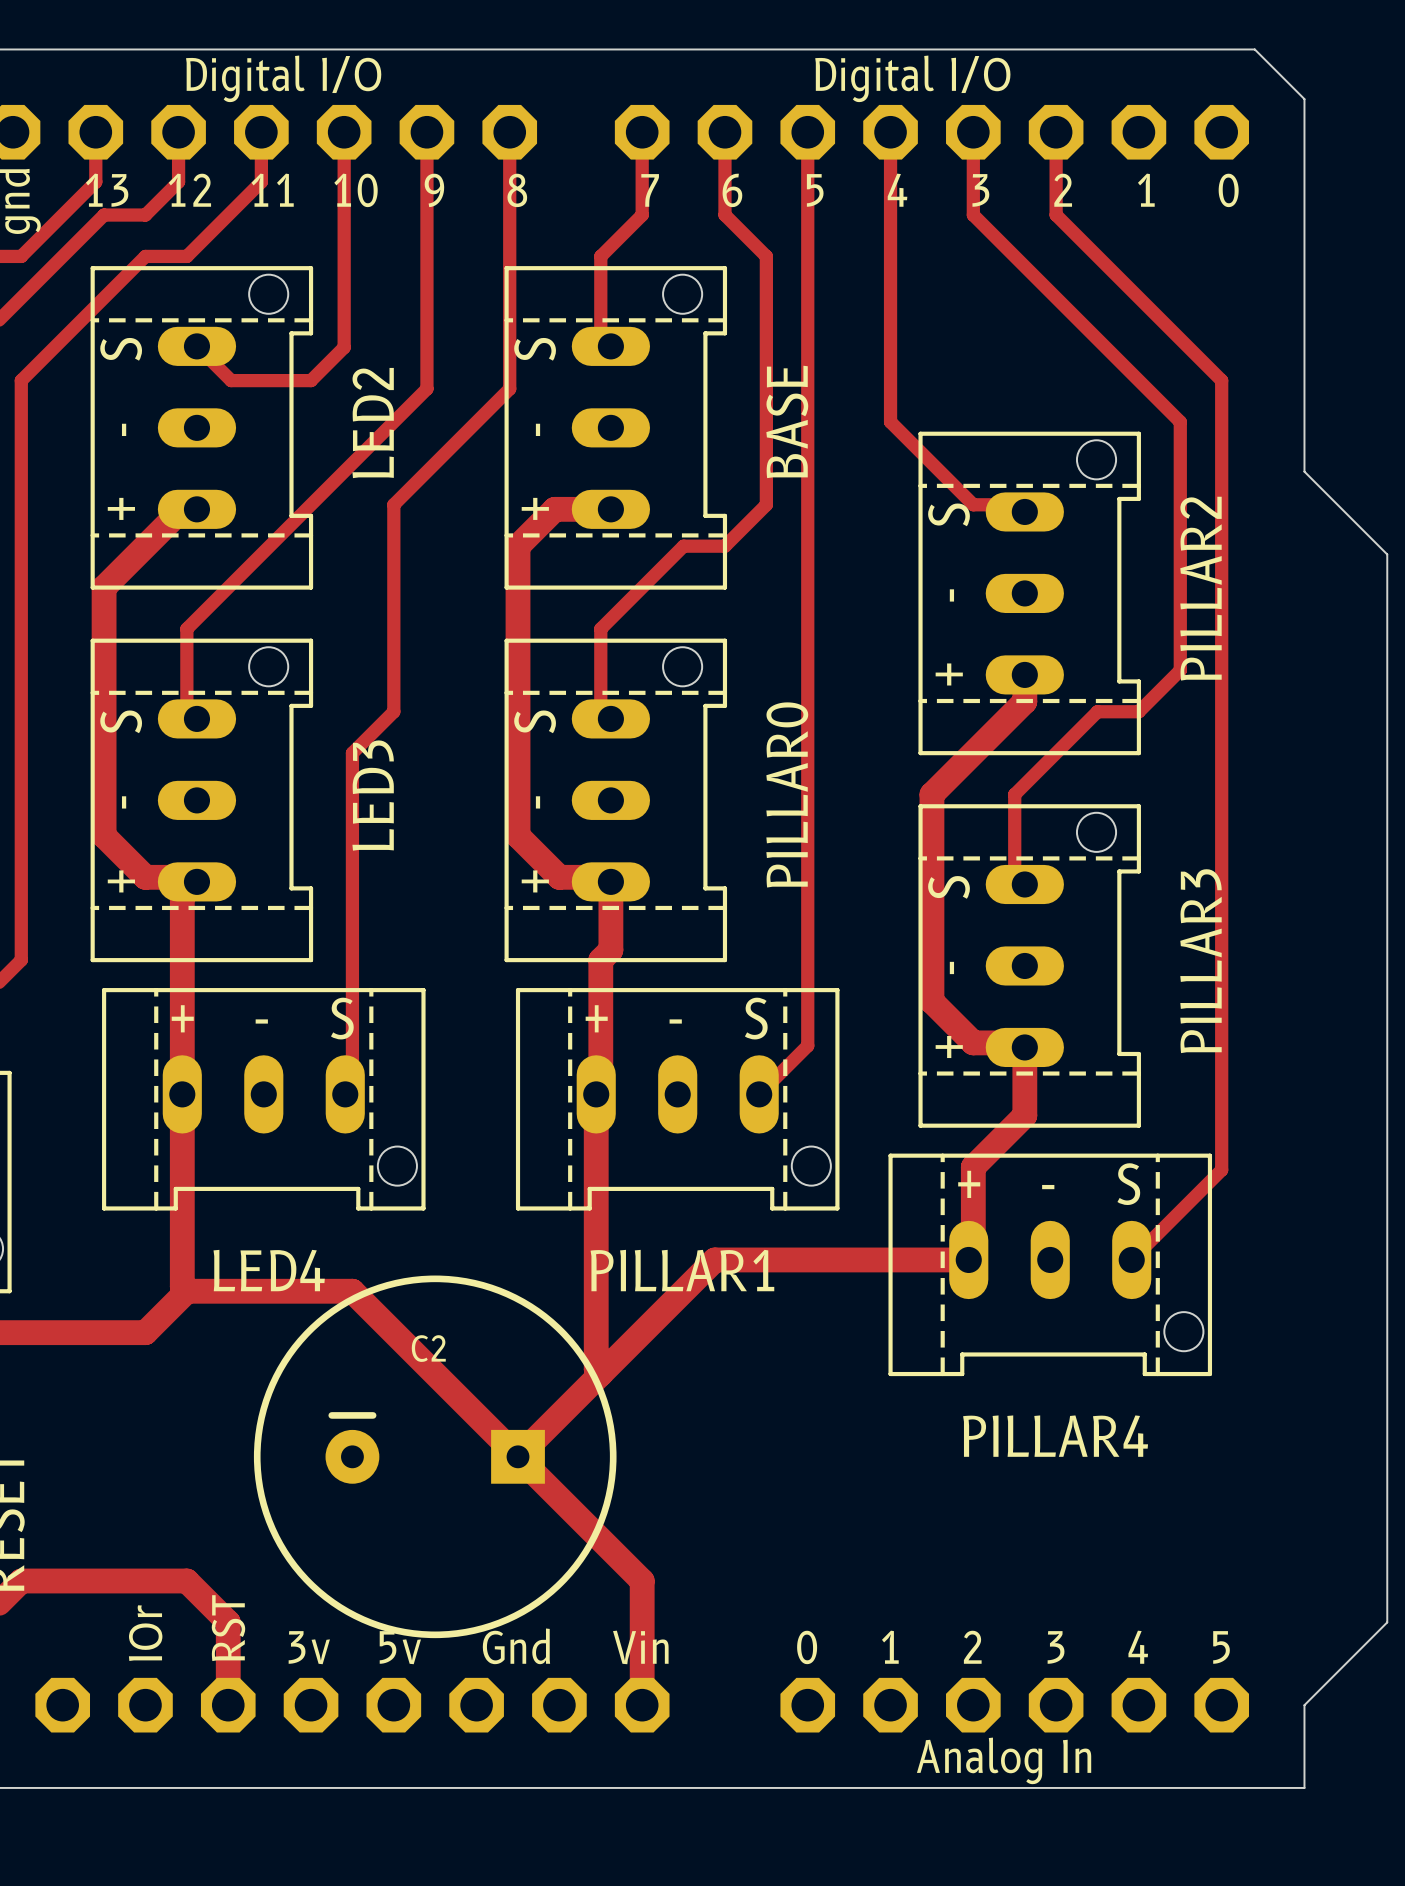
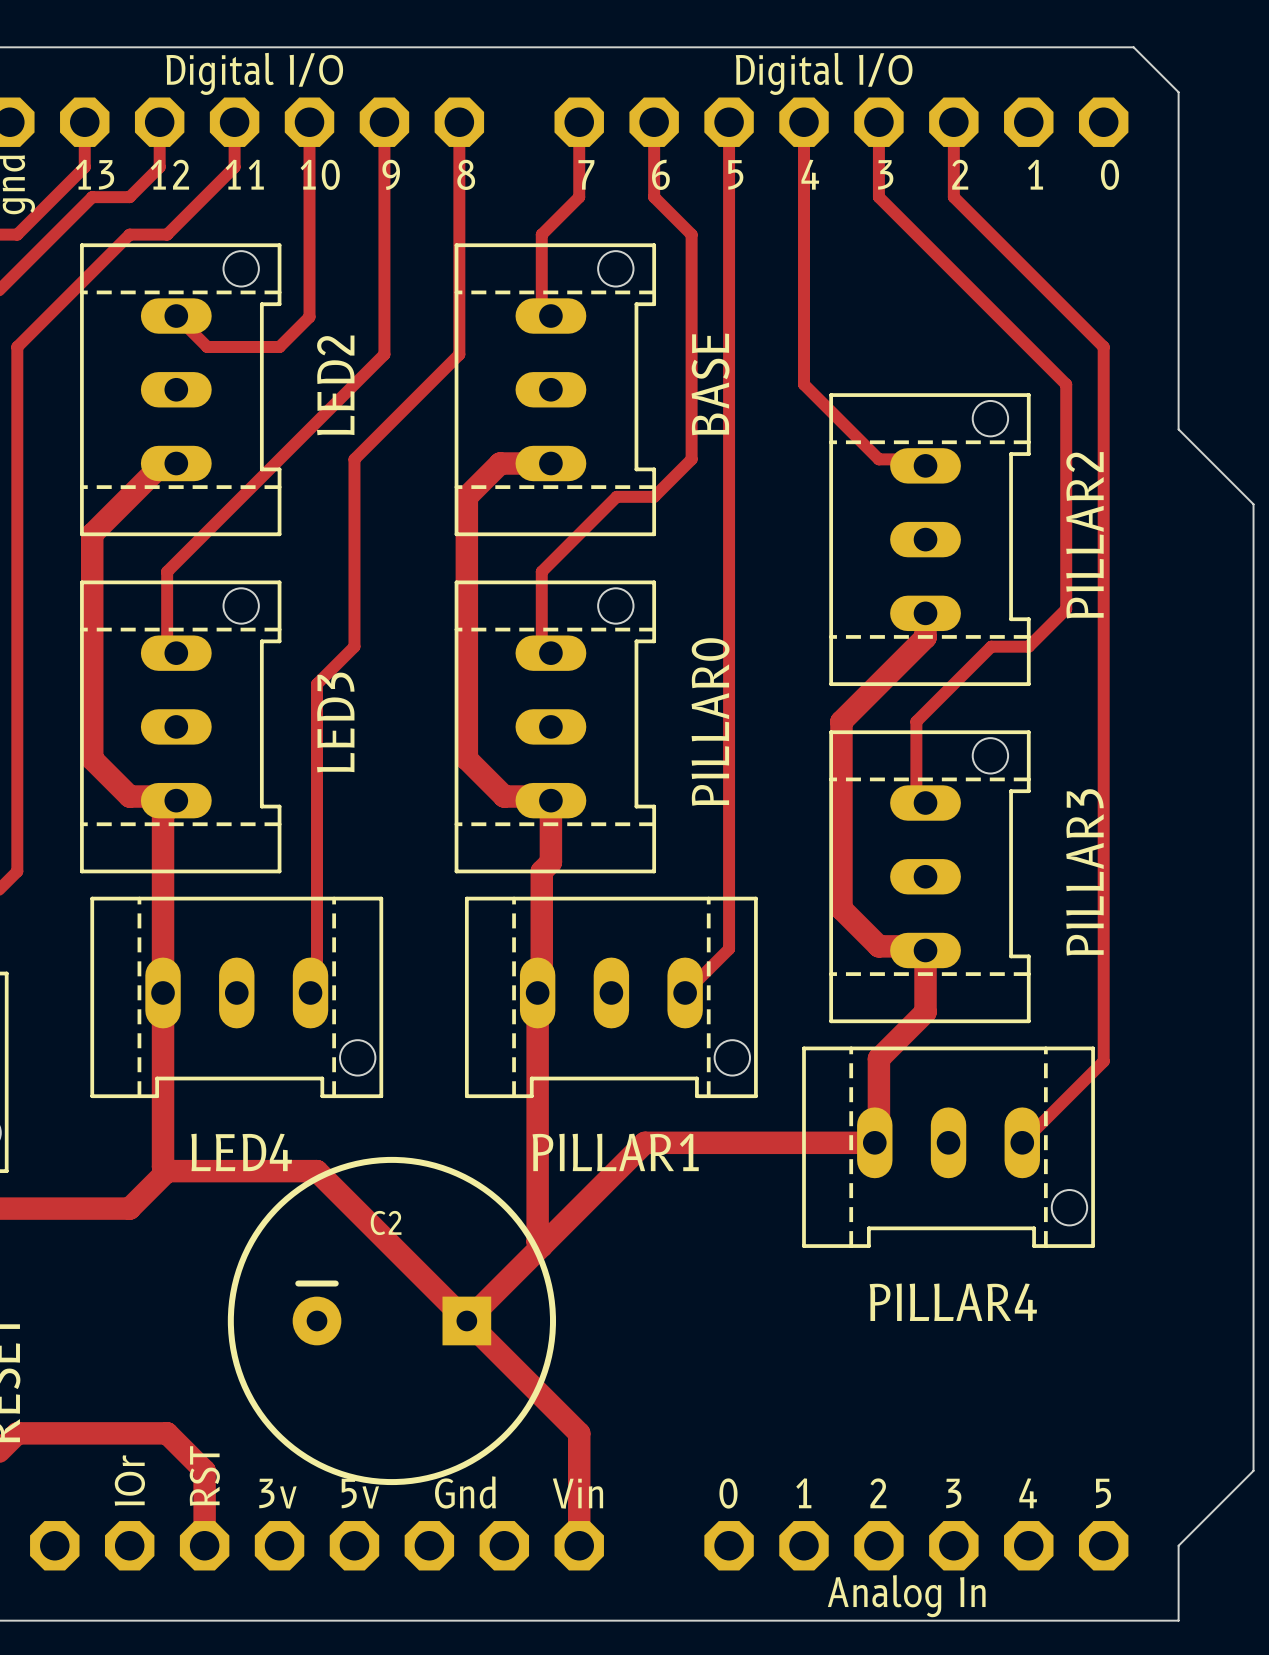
LED2 text: S (121, 349) -> none
BASE text: S (535, 349) -> none
LED2 text: - (124, 429) -> none
BASE text: - (538, 429) -> none
LED2 text: + (121, 508) -> none
BASE text: + (535, 508) -> none
PILLAR2 text: S (949, 514) -> none
PILLAR2 text: - (951, 595) -> none
PILLAR2 text: + (949, 674) -> none
LED3 text: S (121, 721) -> none
PILLAR0 text: S (535, 721) -> none
LED3 text: - (124, 802) -> none
PILLAR0 text: - (538, 802) -> none
LED3 text: + (121, 881) -> none
PILLAR0 text: + (535, 881) -> none
PILLAR3 text: S (949, 887) -> none
PILLAR3 text: - (951, 967) -> none
LED4 text: + (182, 1018) -> none
LED4 text: S (342, 1018) -> none
PILLAR1 text: + (596, 1018) -> none
PILLAR1 text: S (756, 1018) -> none
LED4 text: - (261, 1021) -> none
PILLAR1 text: - (675, 1021) -> none
PILLAR3 text: + (949, 1047) -> none
PILLAR4 text: + (969, 1184) -> none
PILLAR4 text: S (1128, 1184) -> none
PILLAR4 text: - (1048, 1187) -> none

